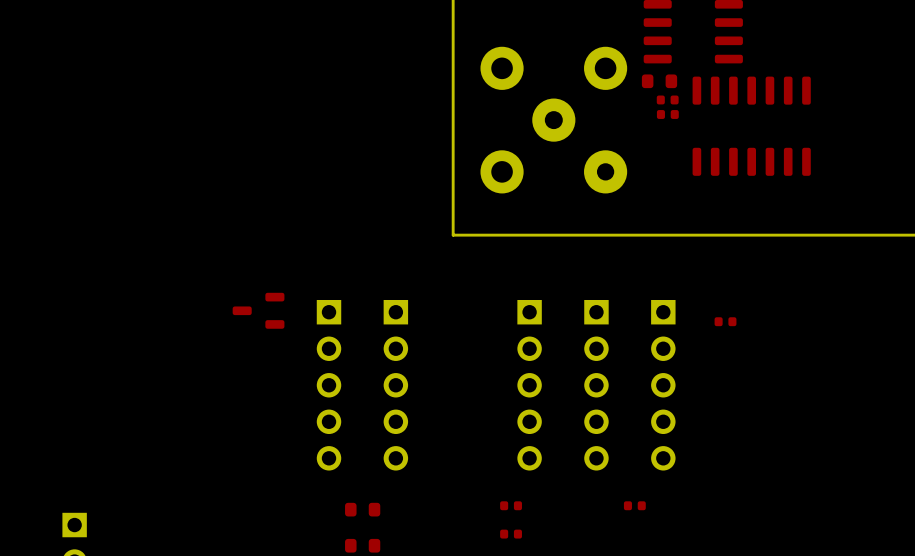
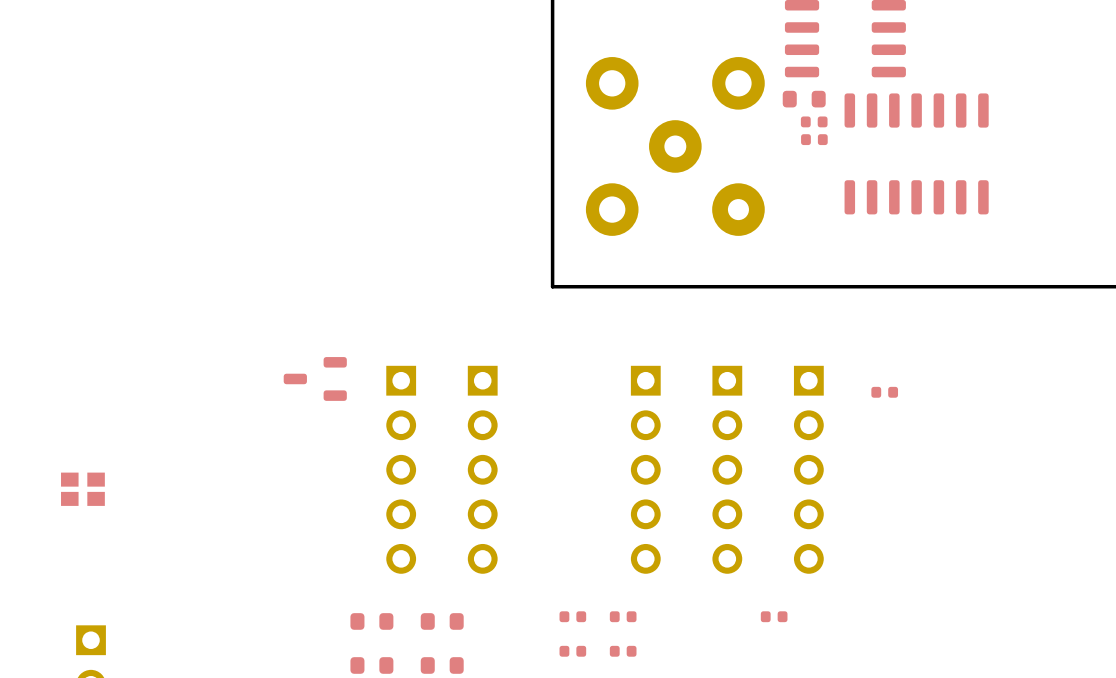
part: none -> (82, 489)
part: none -> (572, 616)
part: none -> (371, 621)
part: none -> (572, 651)
part: none -> (371, 665)

